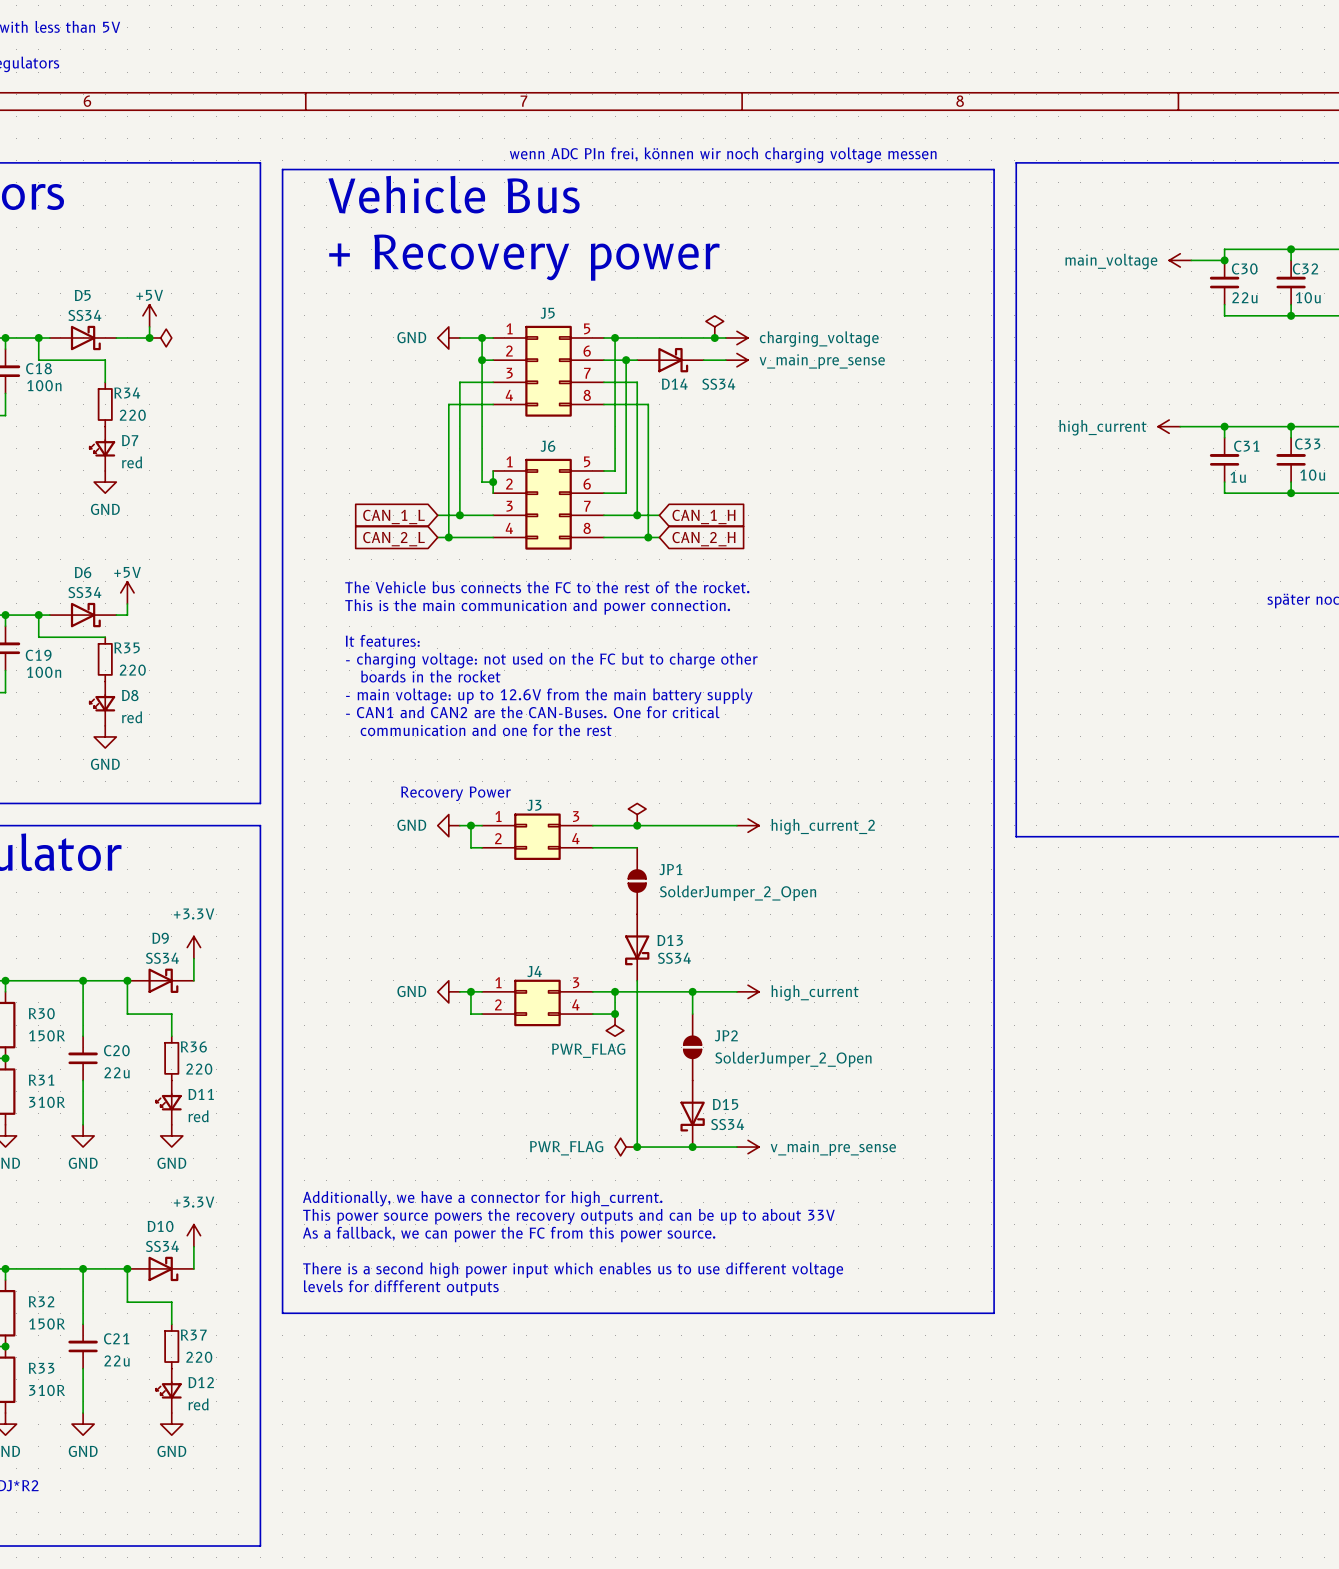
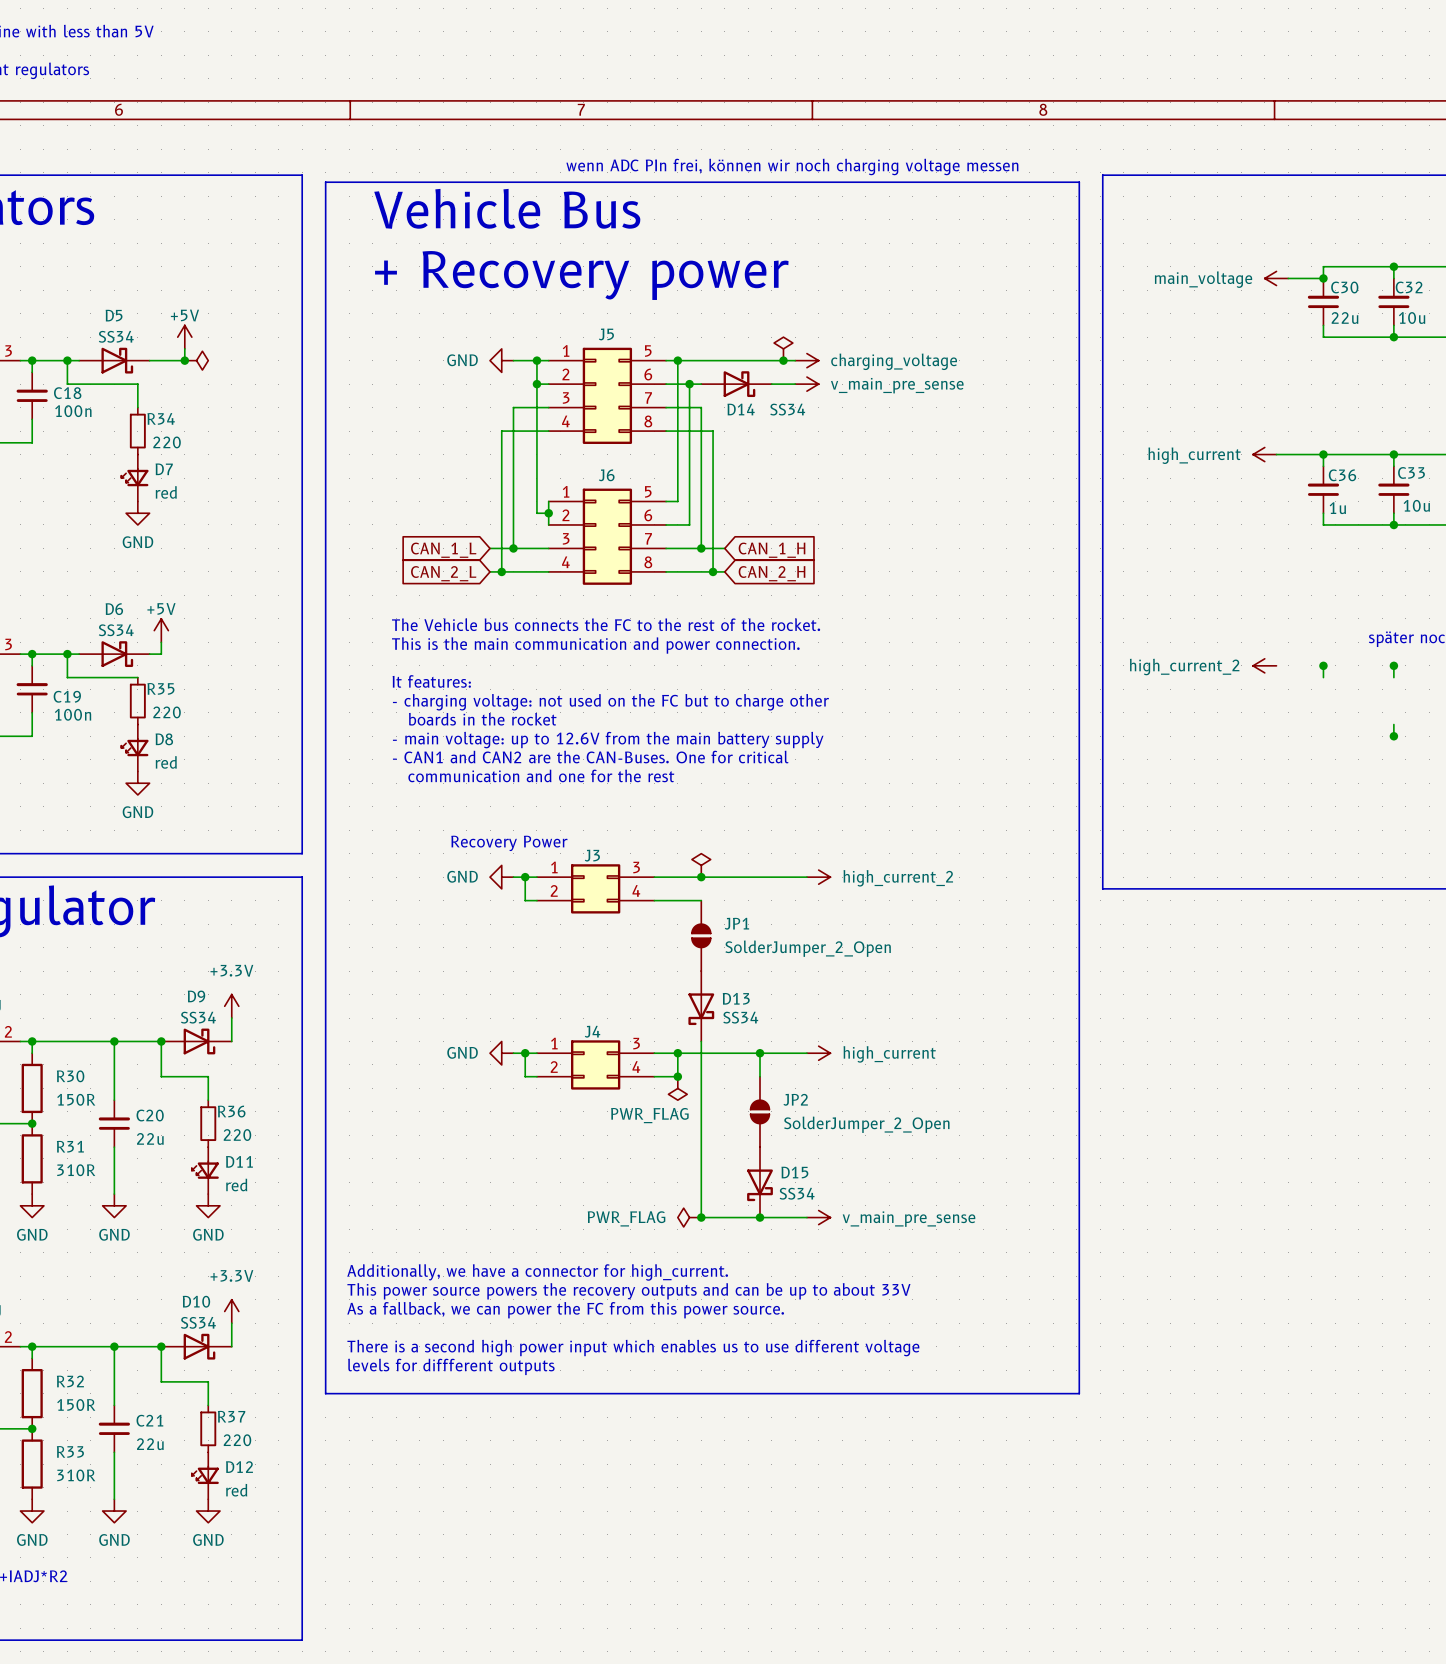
C31 name: C31 (1246, 446) -> C36 (1342, 475)
power symbol: none -> high_current_2 (1264, 665)
wire: none -> (1323, 665) (1323, 677)
junction: none -> (1323, 665)
wire: none -> (1393, 665) (1393, 677)
junction: none -> (1393, 665)
wire: none -> (1393, 724) (1393, 736)
junction: none -> (1393, 736)

